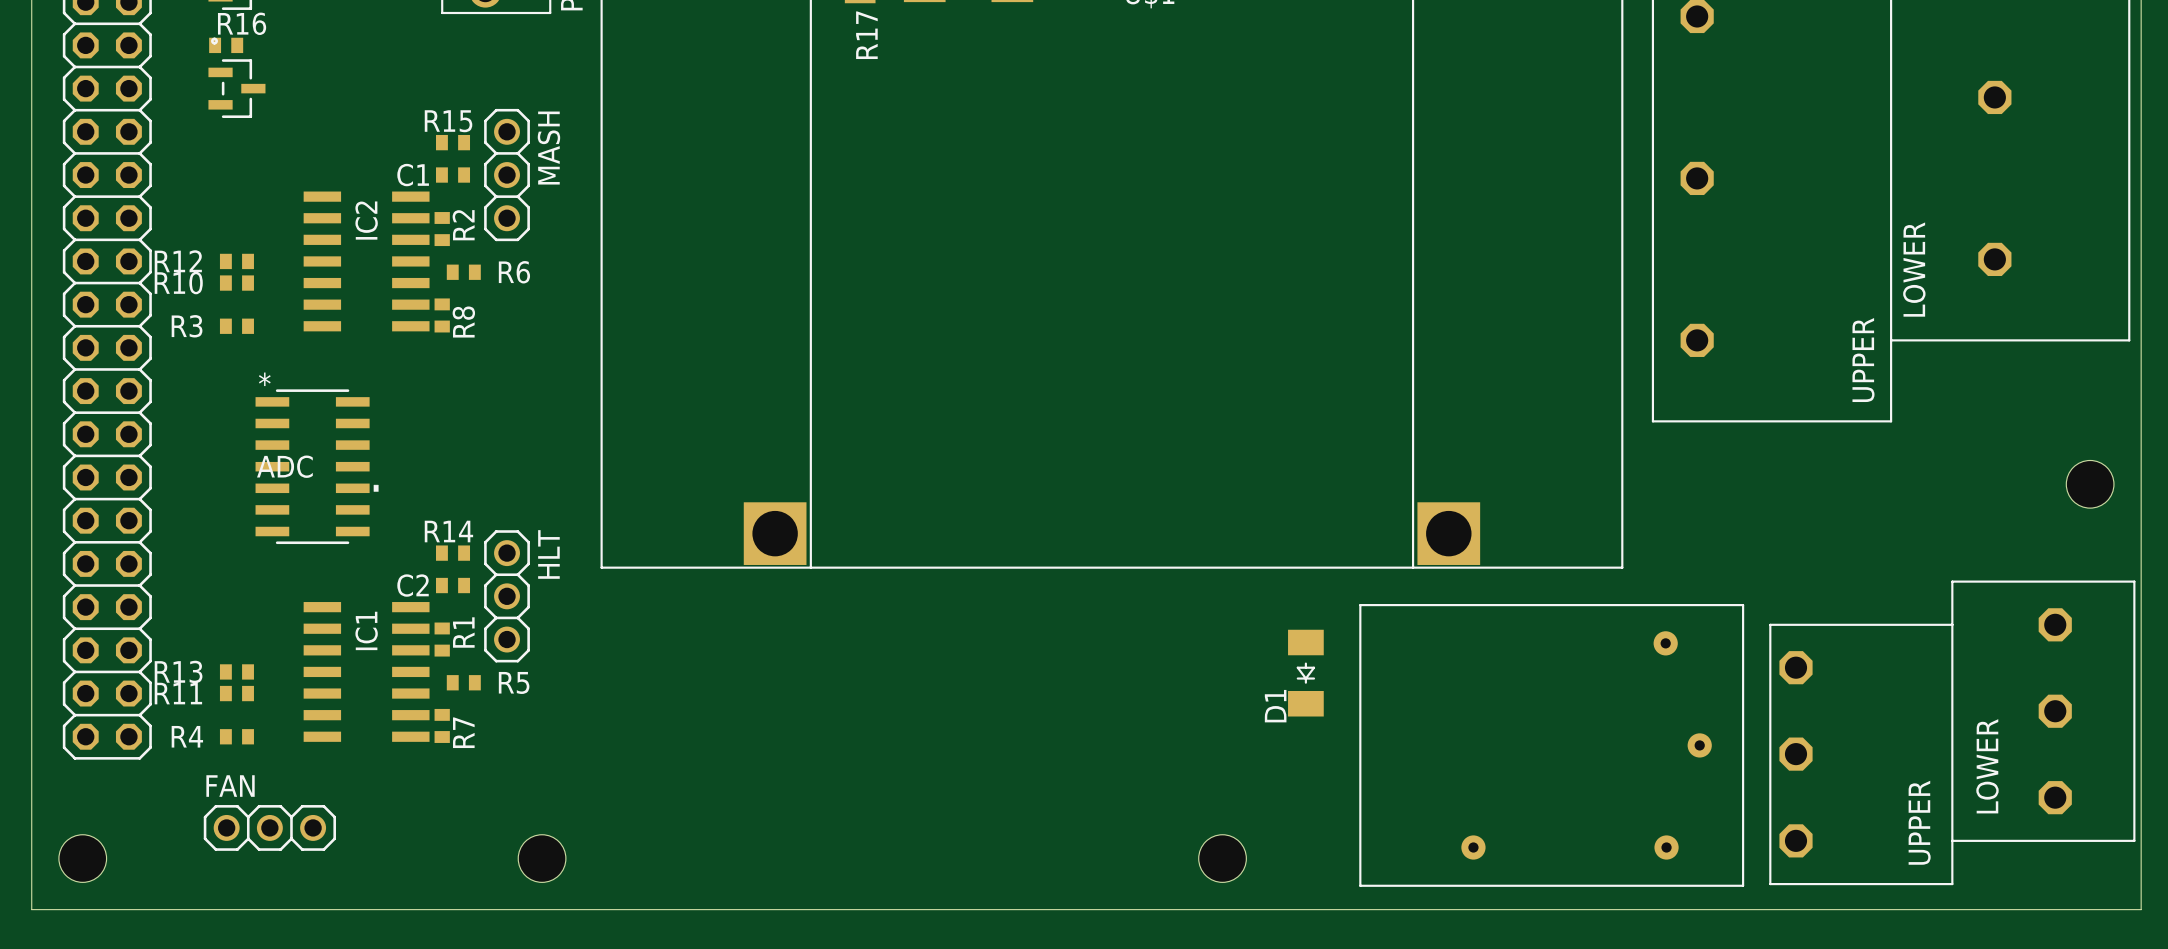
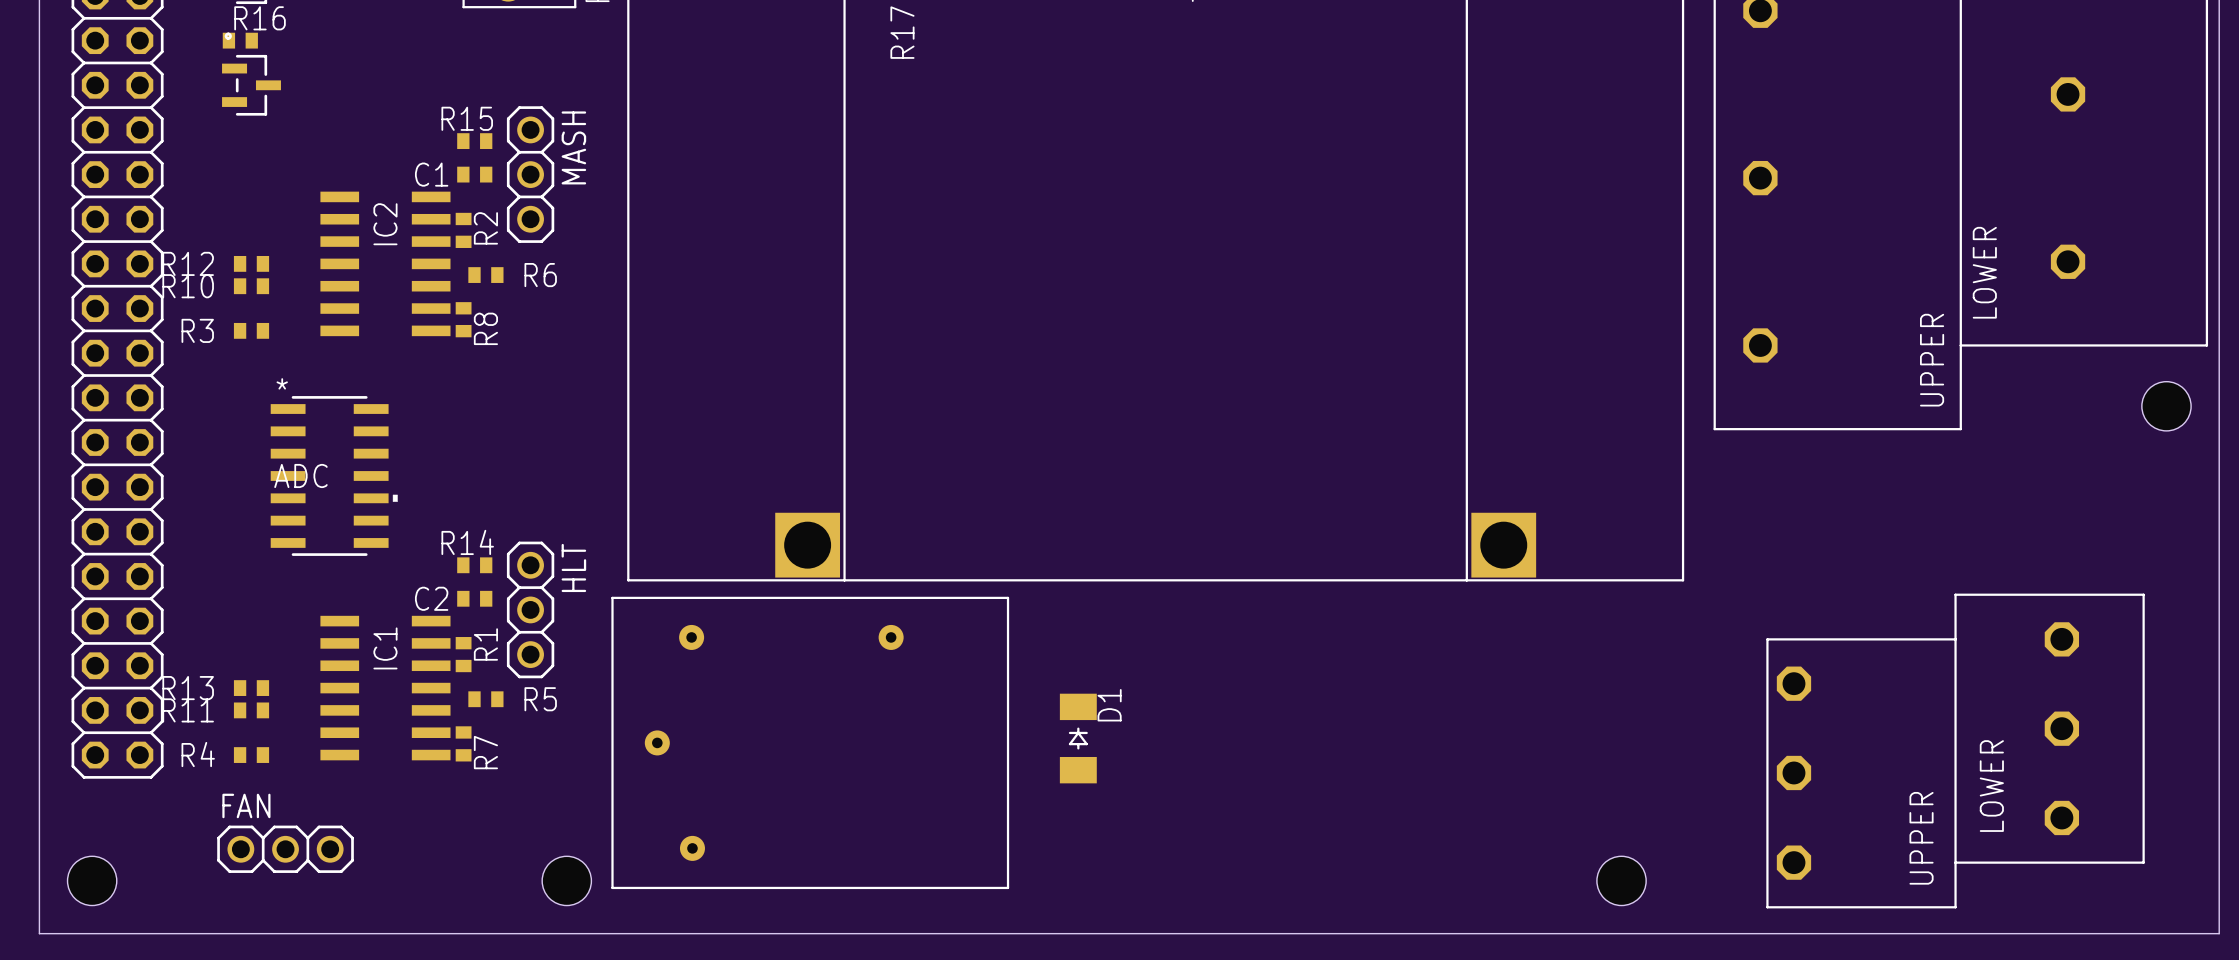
hole position: (2090, 484) -> (2166, 406)
D1 position: (1305, 673) -> (1078, 738)
D1 name position: D1 (1275, 706) -> D1 (1109, 705)
part: none -> (810, 742)
part position: (1952, 732) -> (1955, 751)
part: (1551, 745) -> none
hole: (1222, 858) -> none
hole: none -> (1621, 880)

